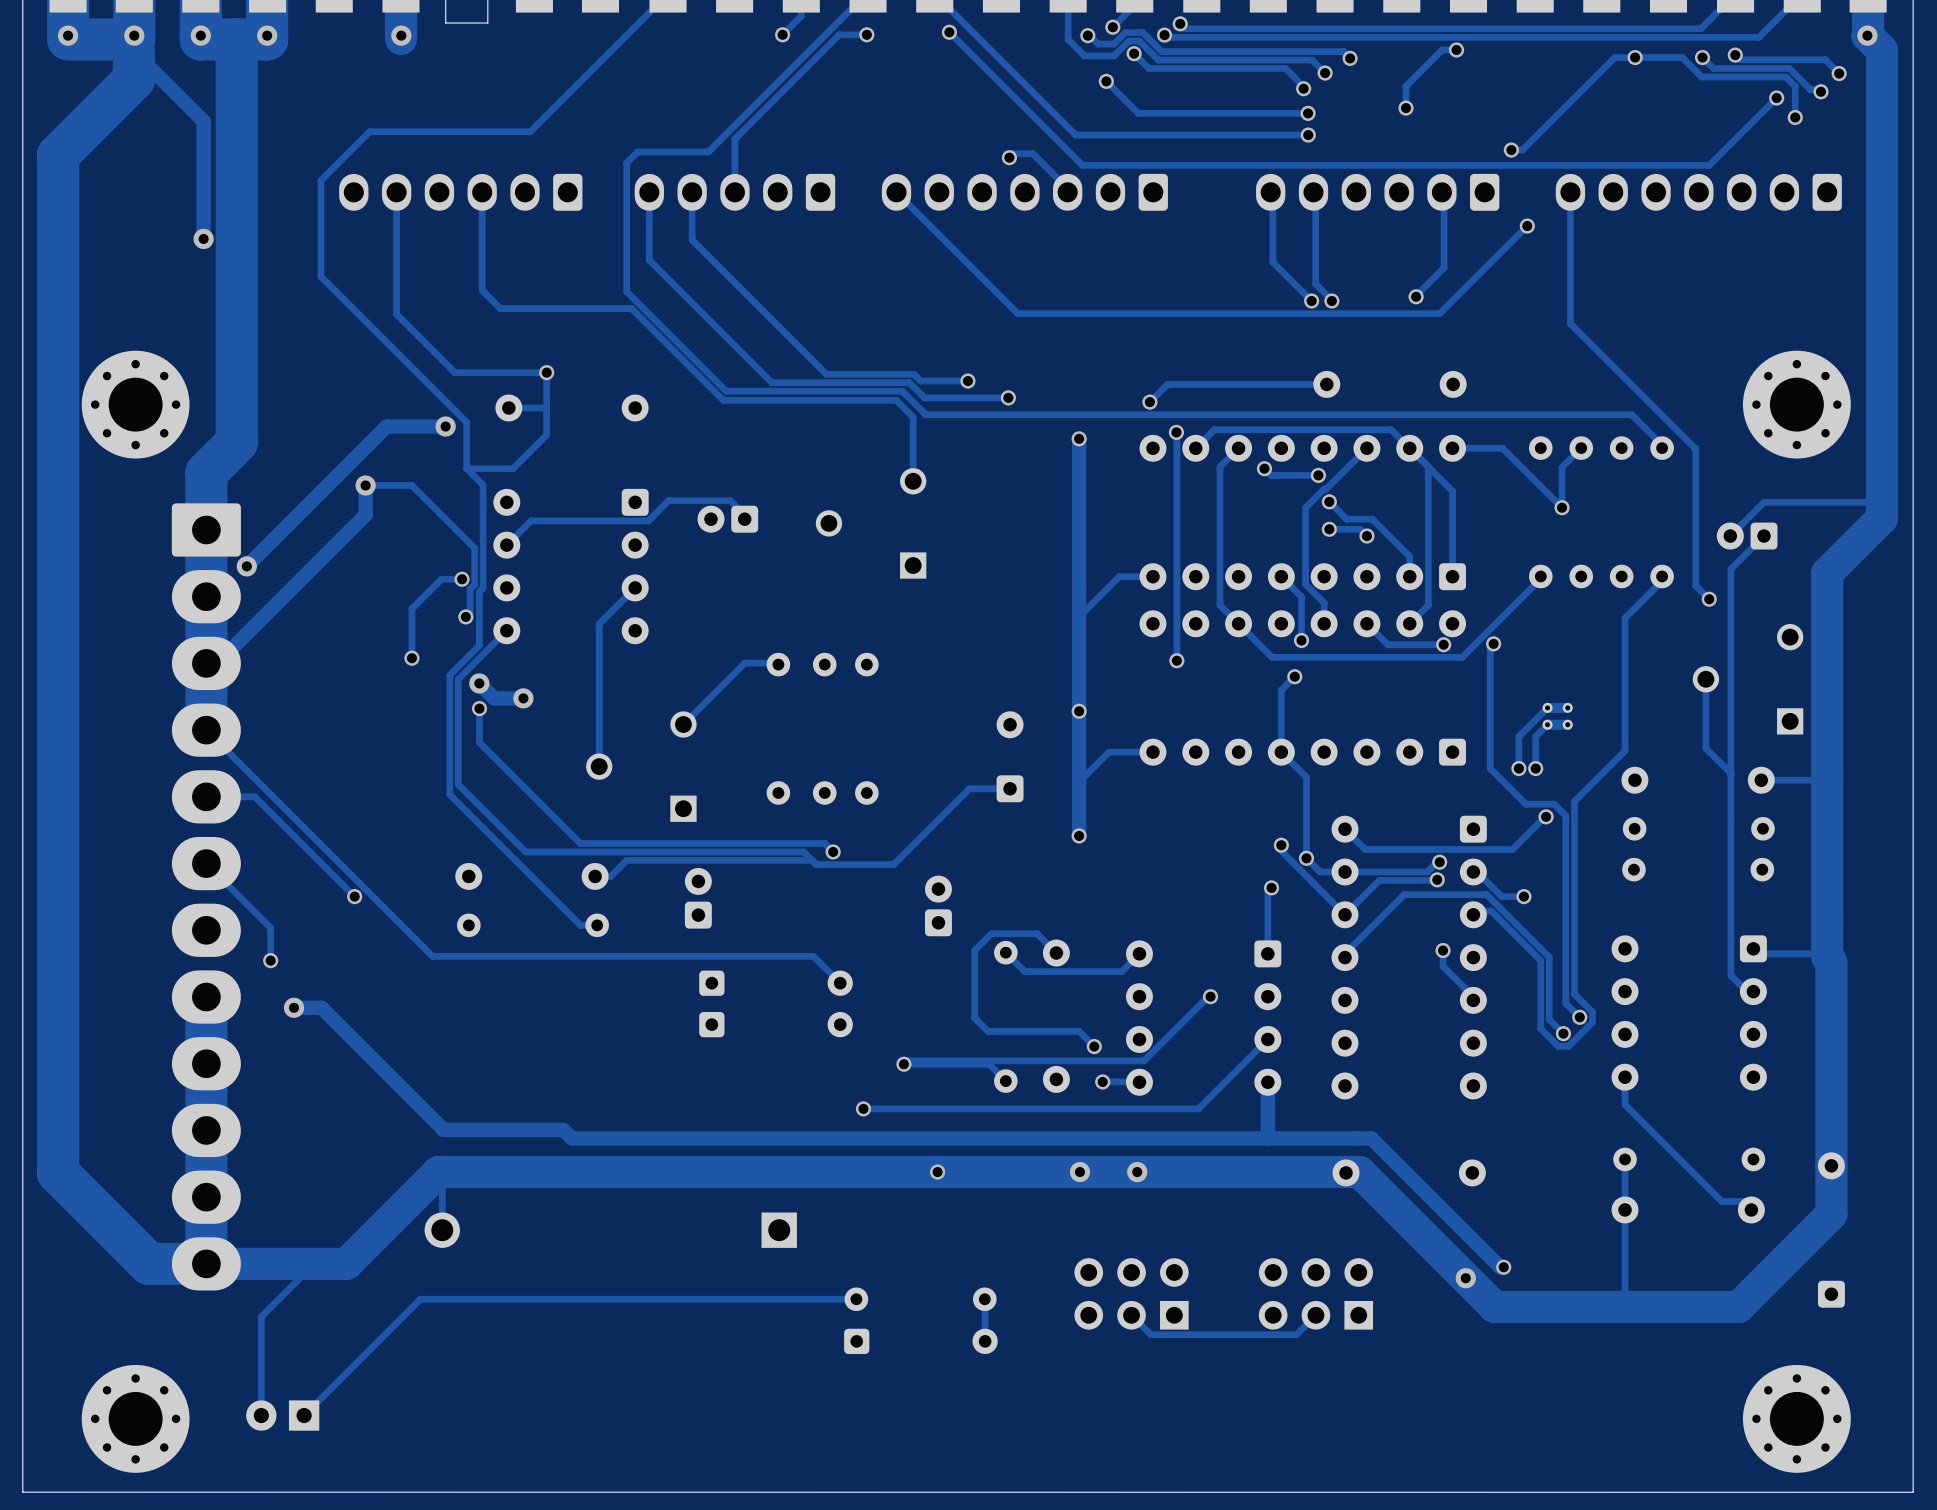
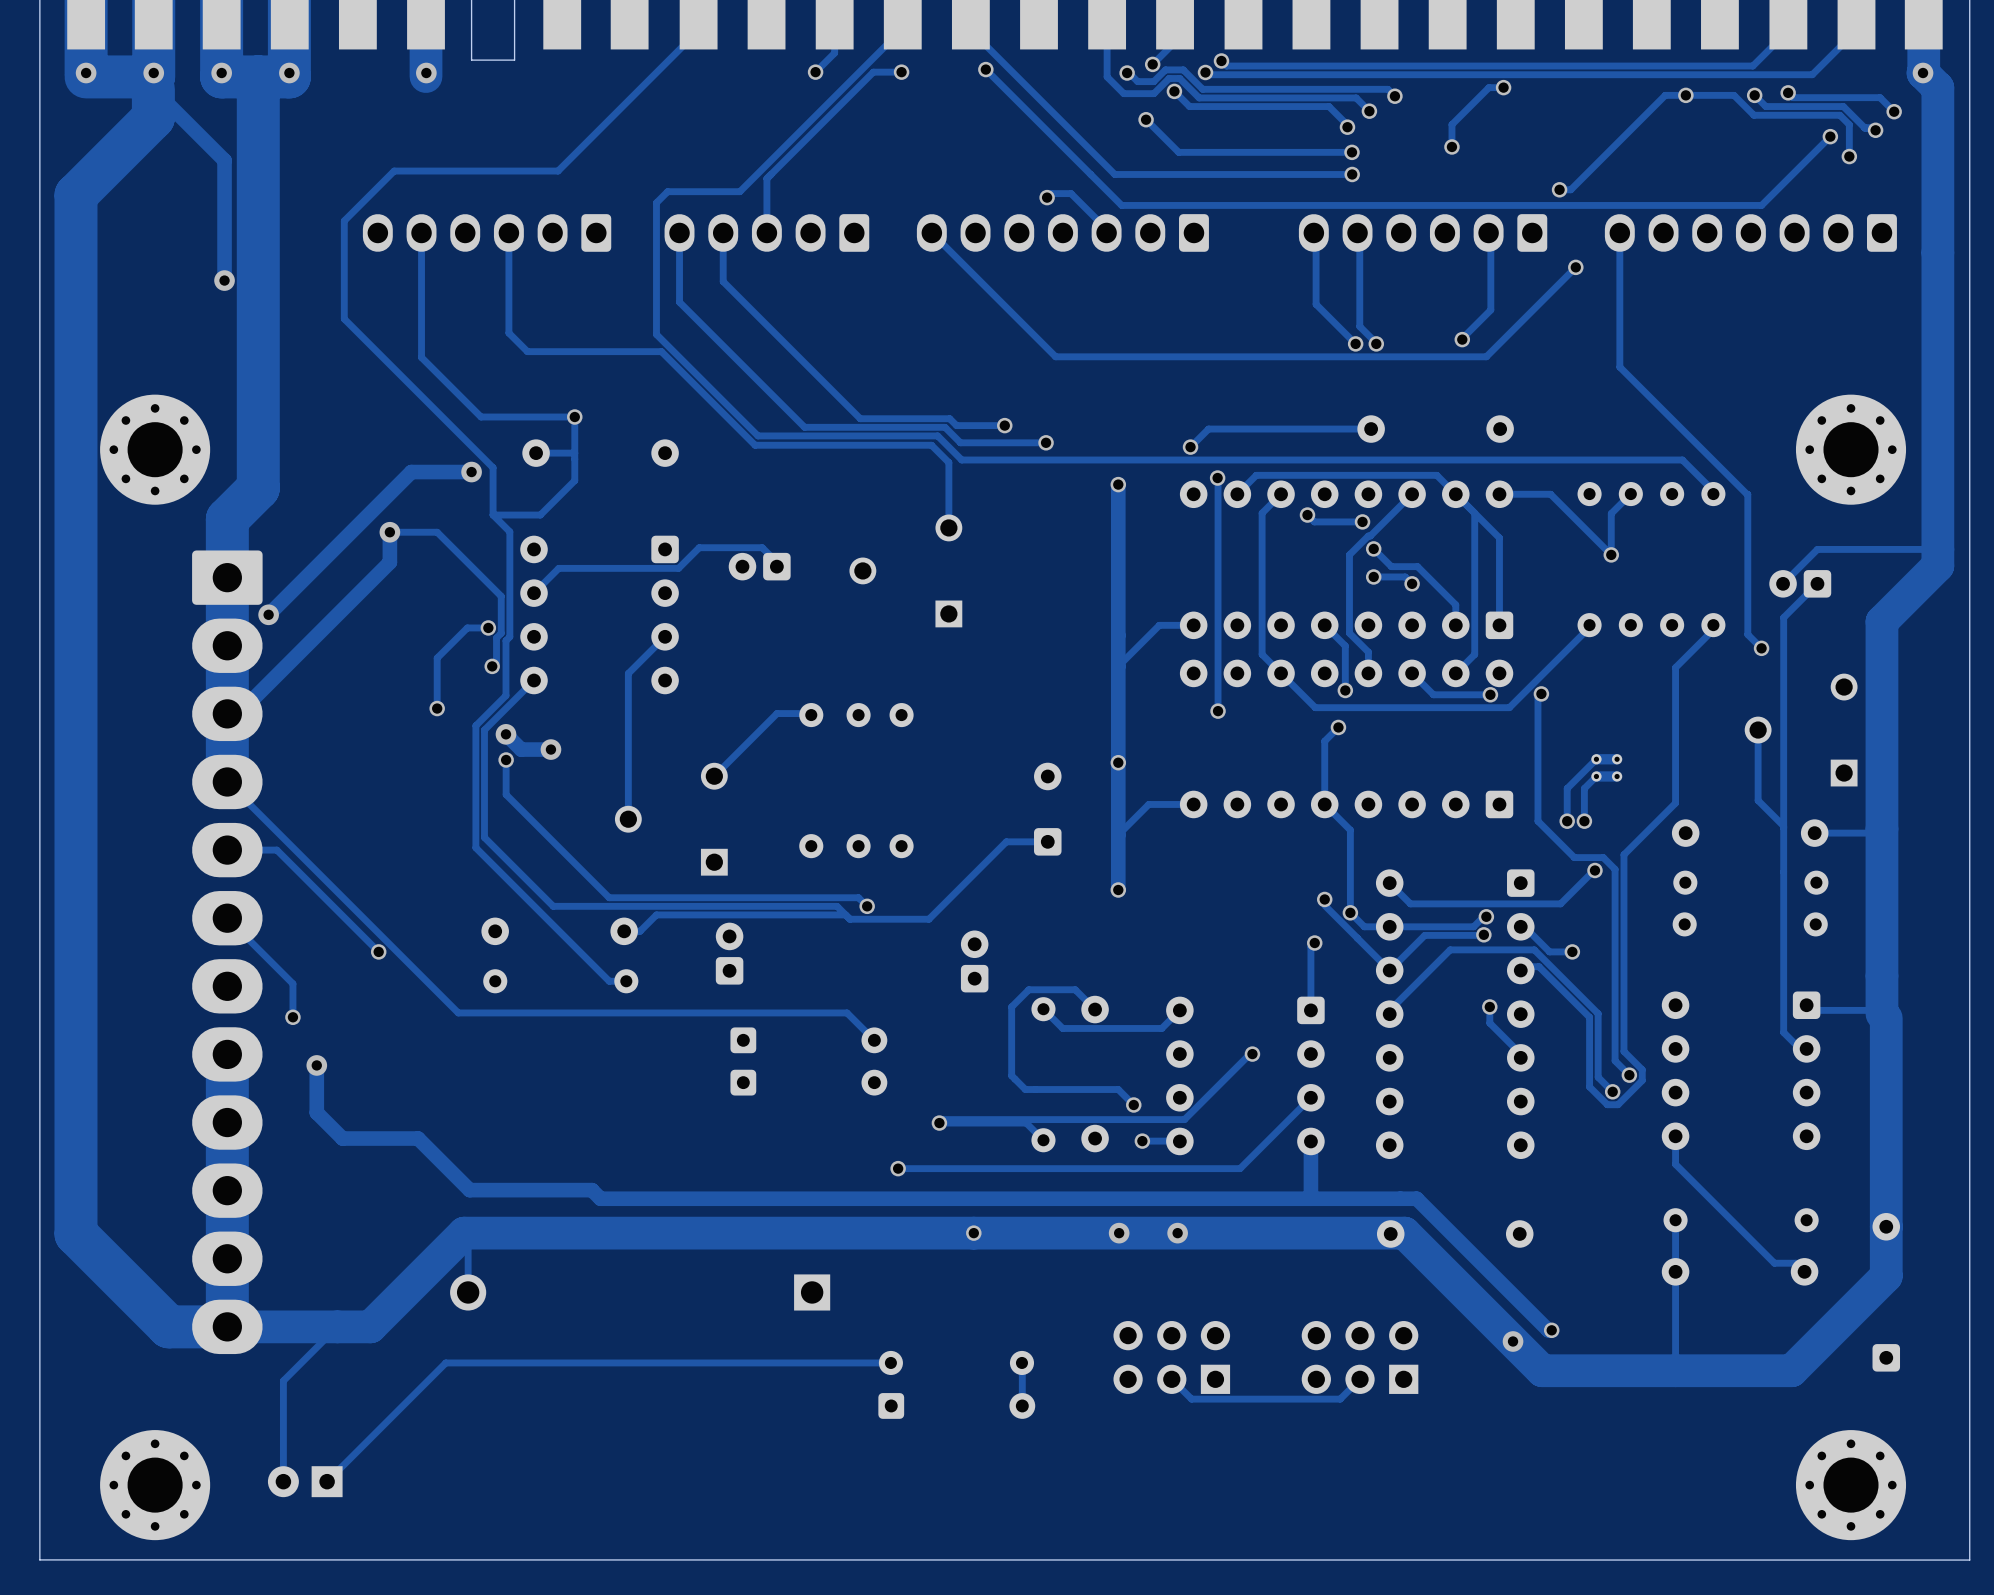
track: (294, 1007) (321, 1007) (393, 1079) -> (316, 1065) (316, 1112) (342, 1138) (418, 1138)

